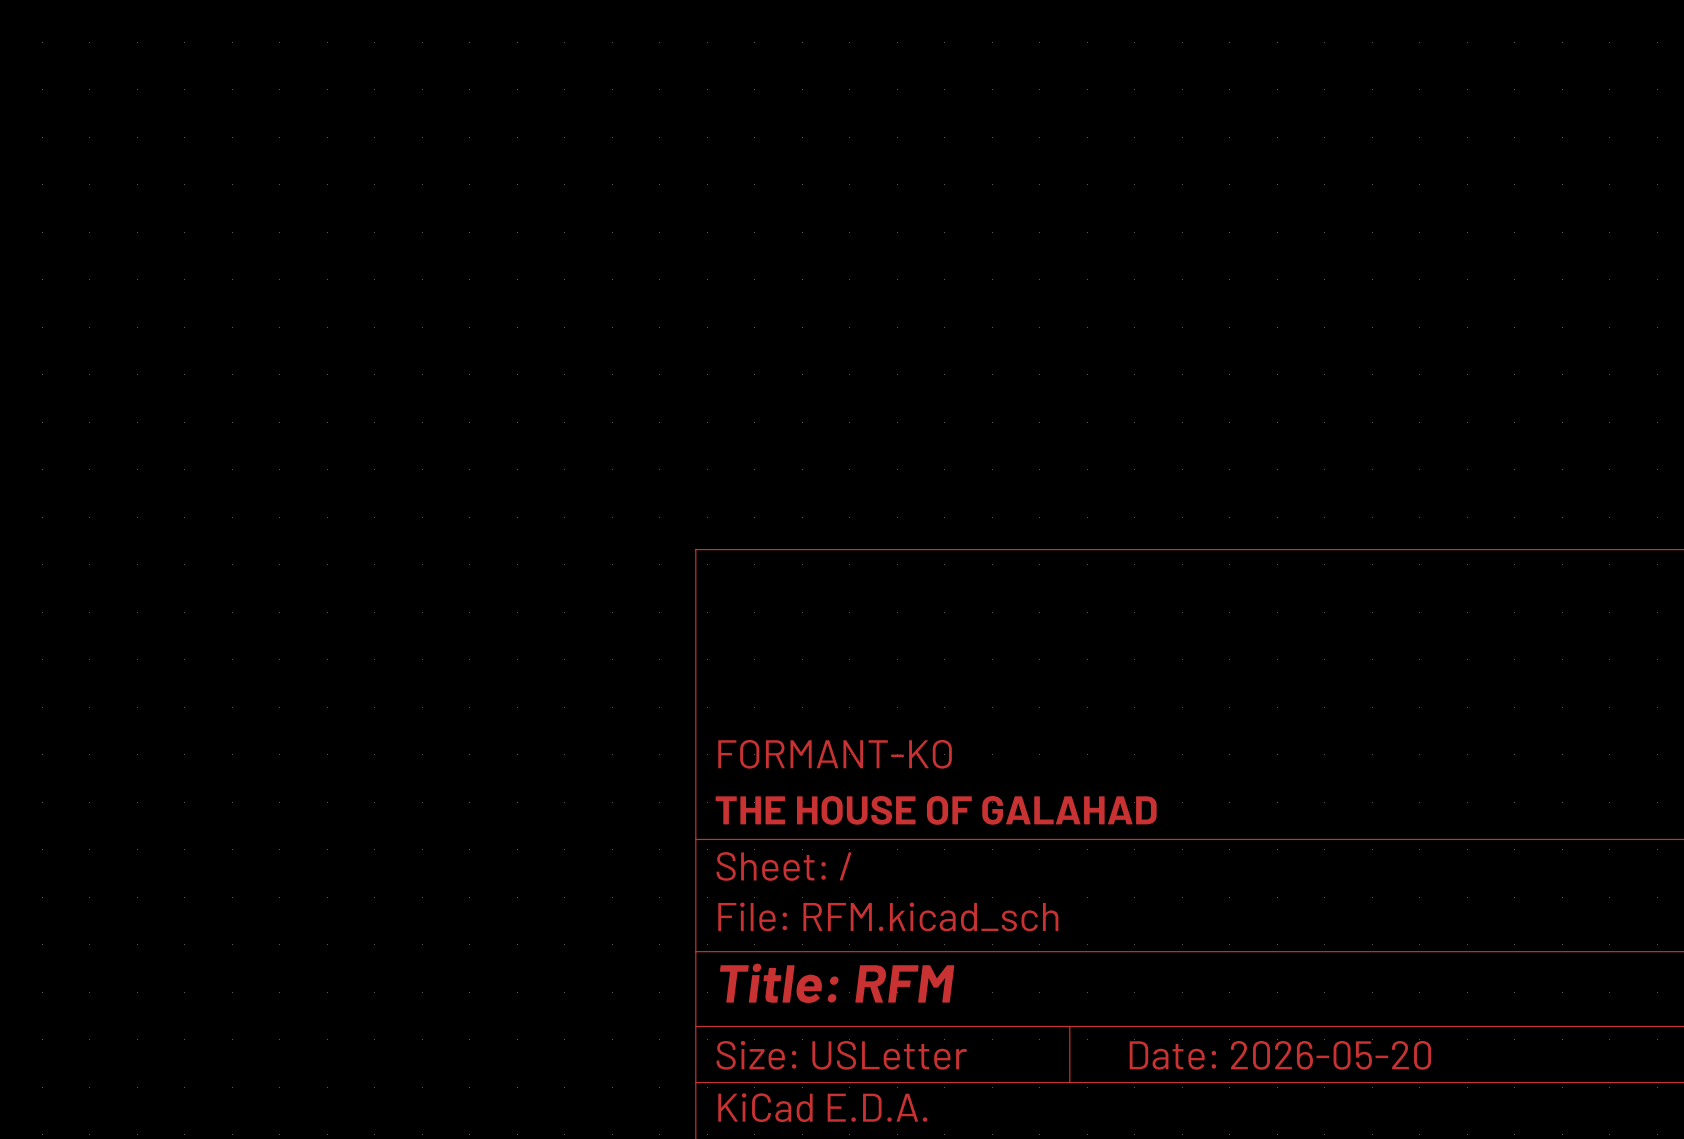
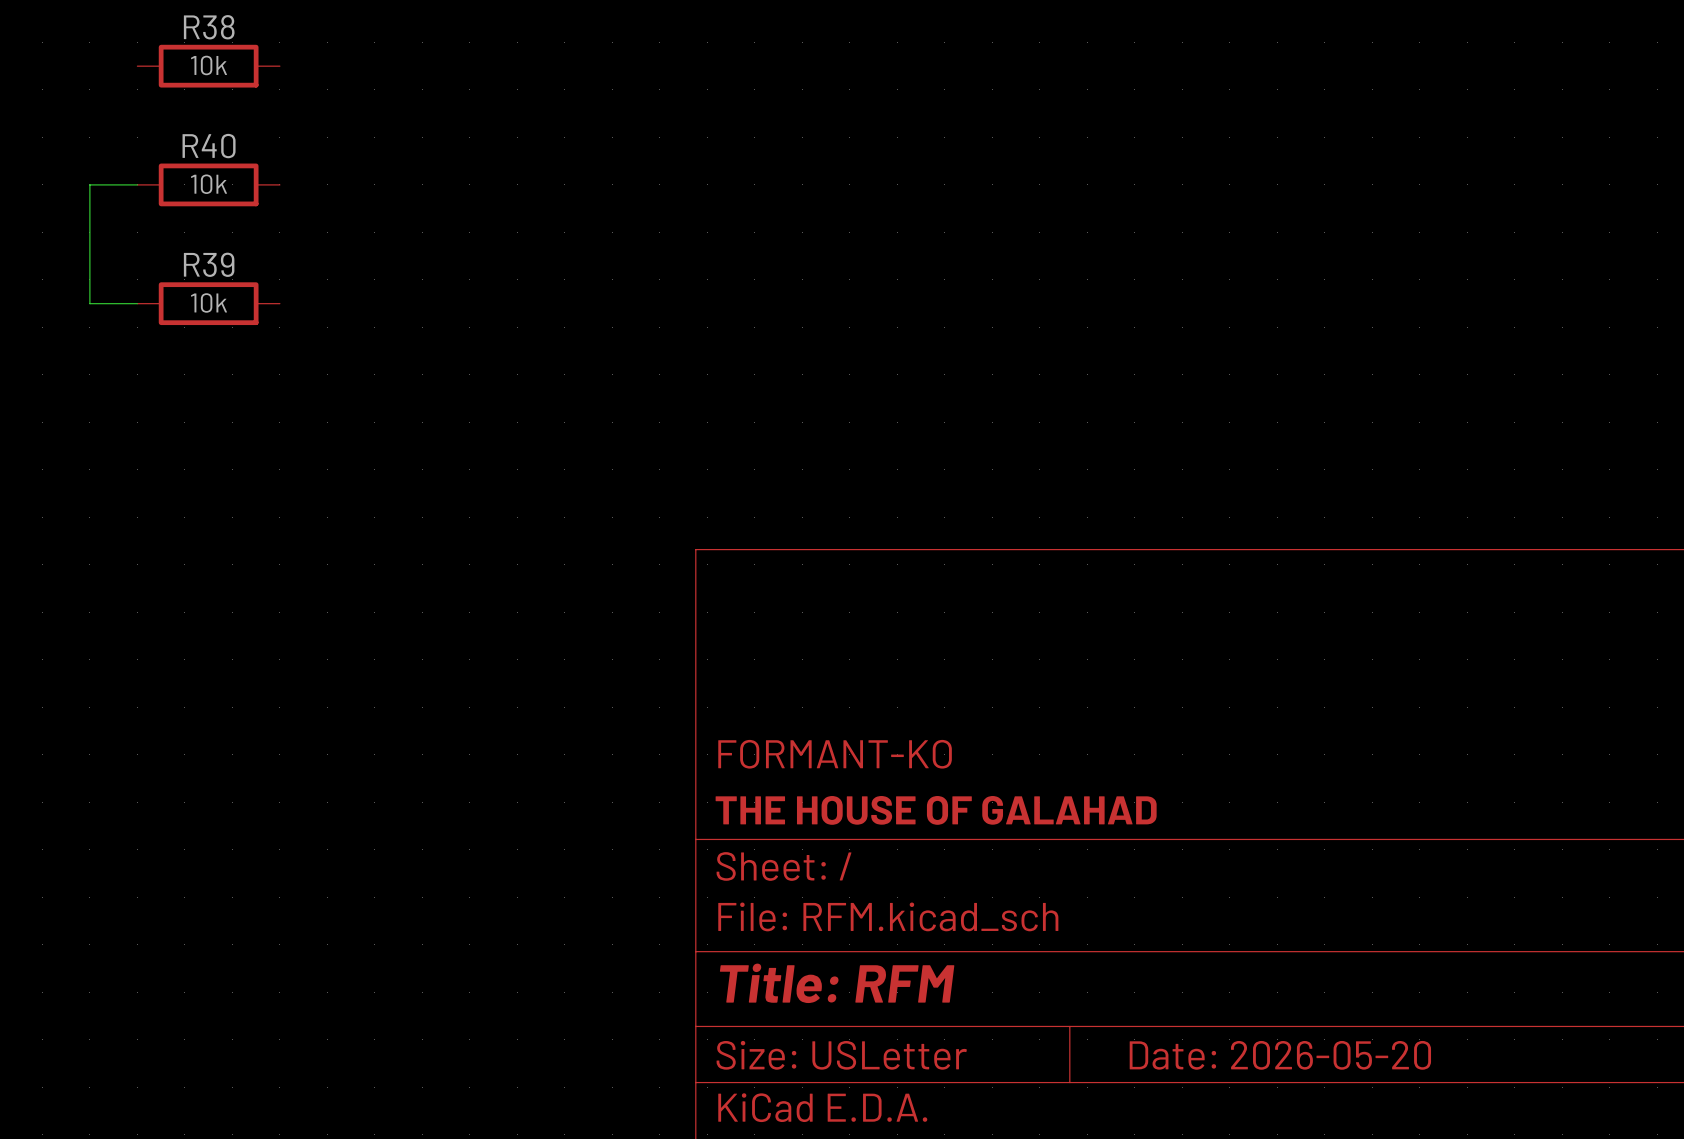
R38: none -> 10k (208, 66)
wire: none -> (137, 184) (89, 184) (89, 303) (137, 303)
R40: none -> 10k (208, 184)
R39: none -> 10k (208, 303)

